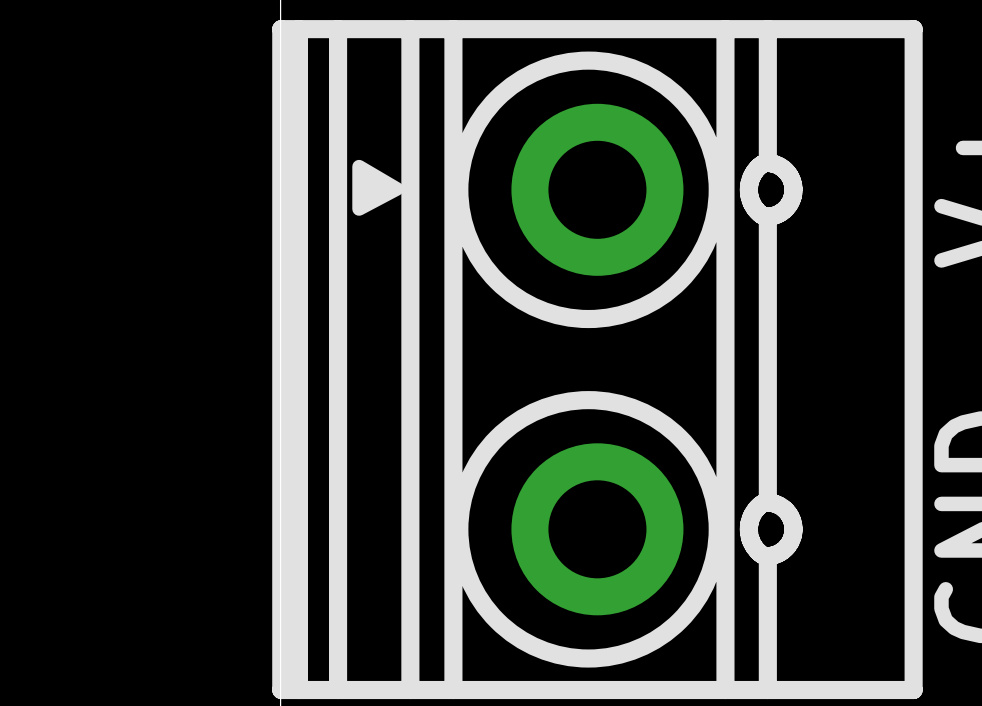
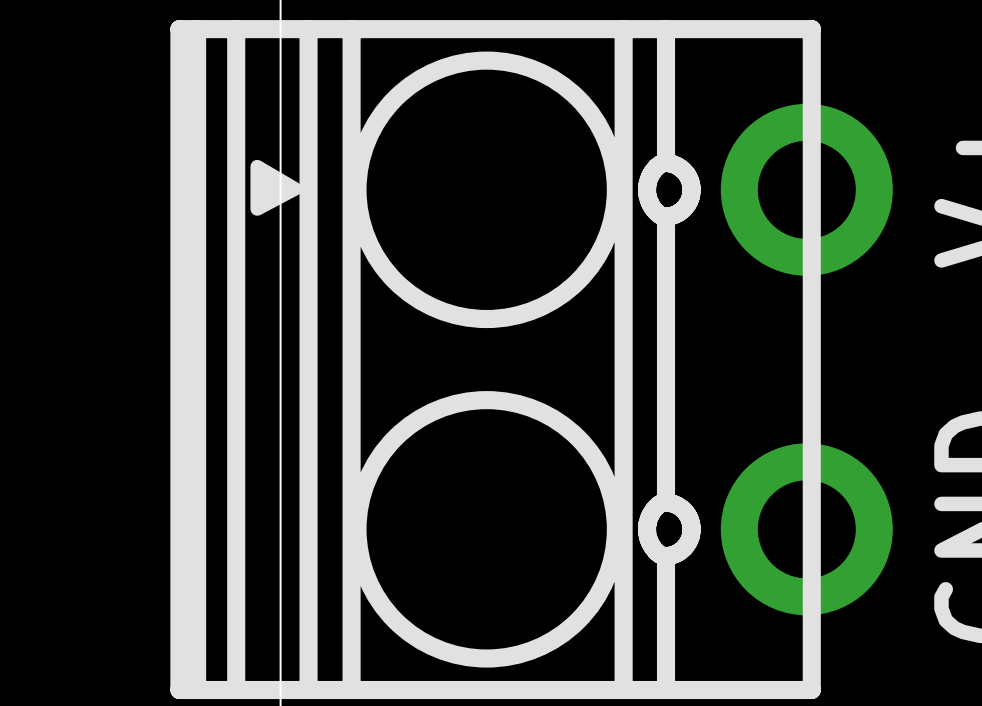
part footprint: [272, 20, 923, 700] -> [170, 20, 893, 700]

